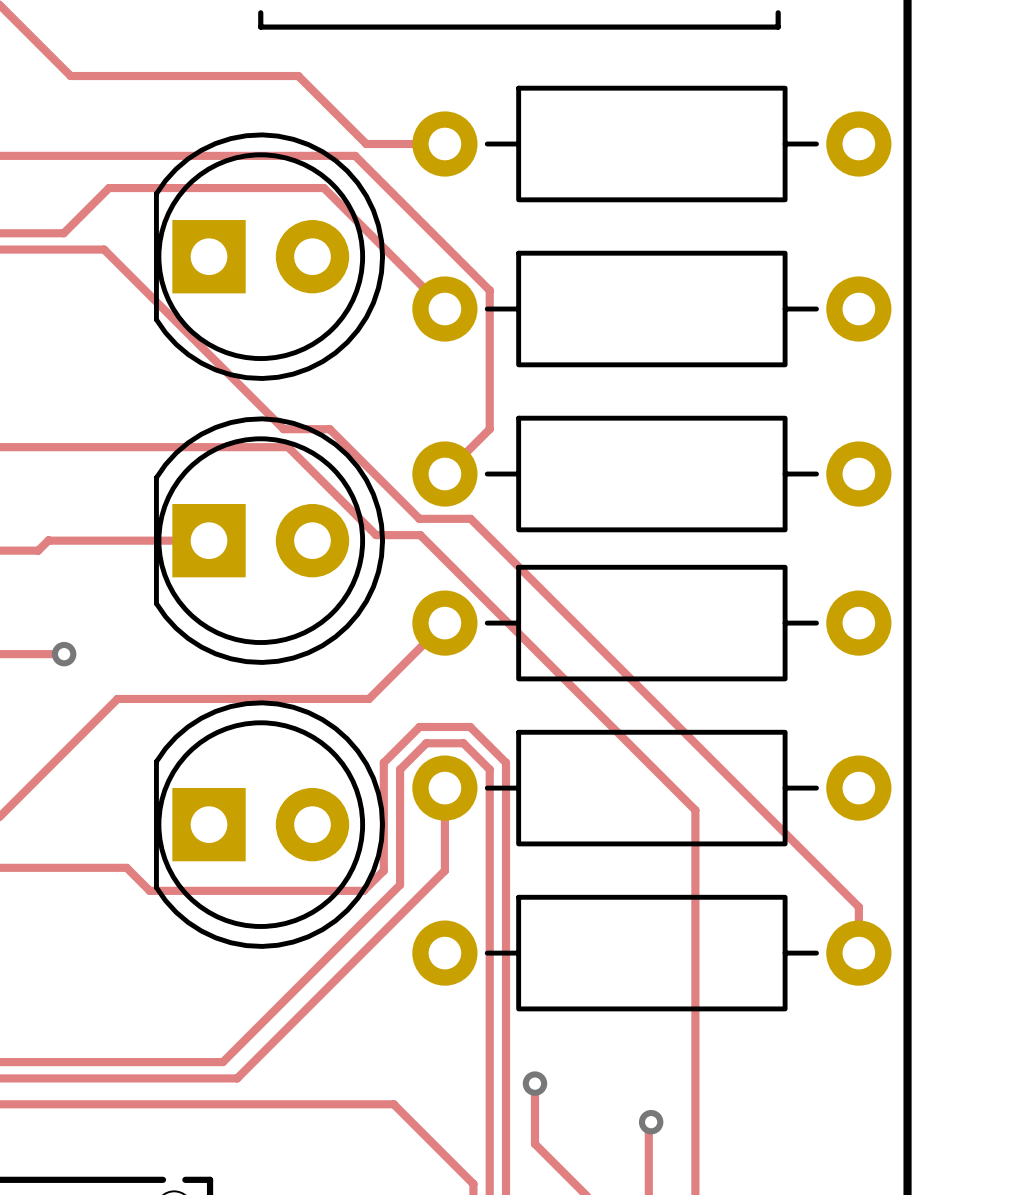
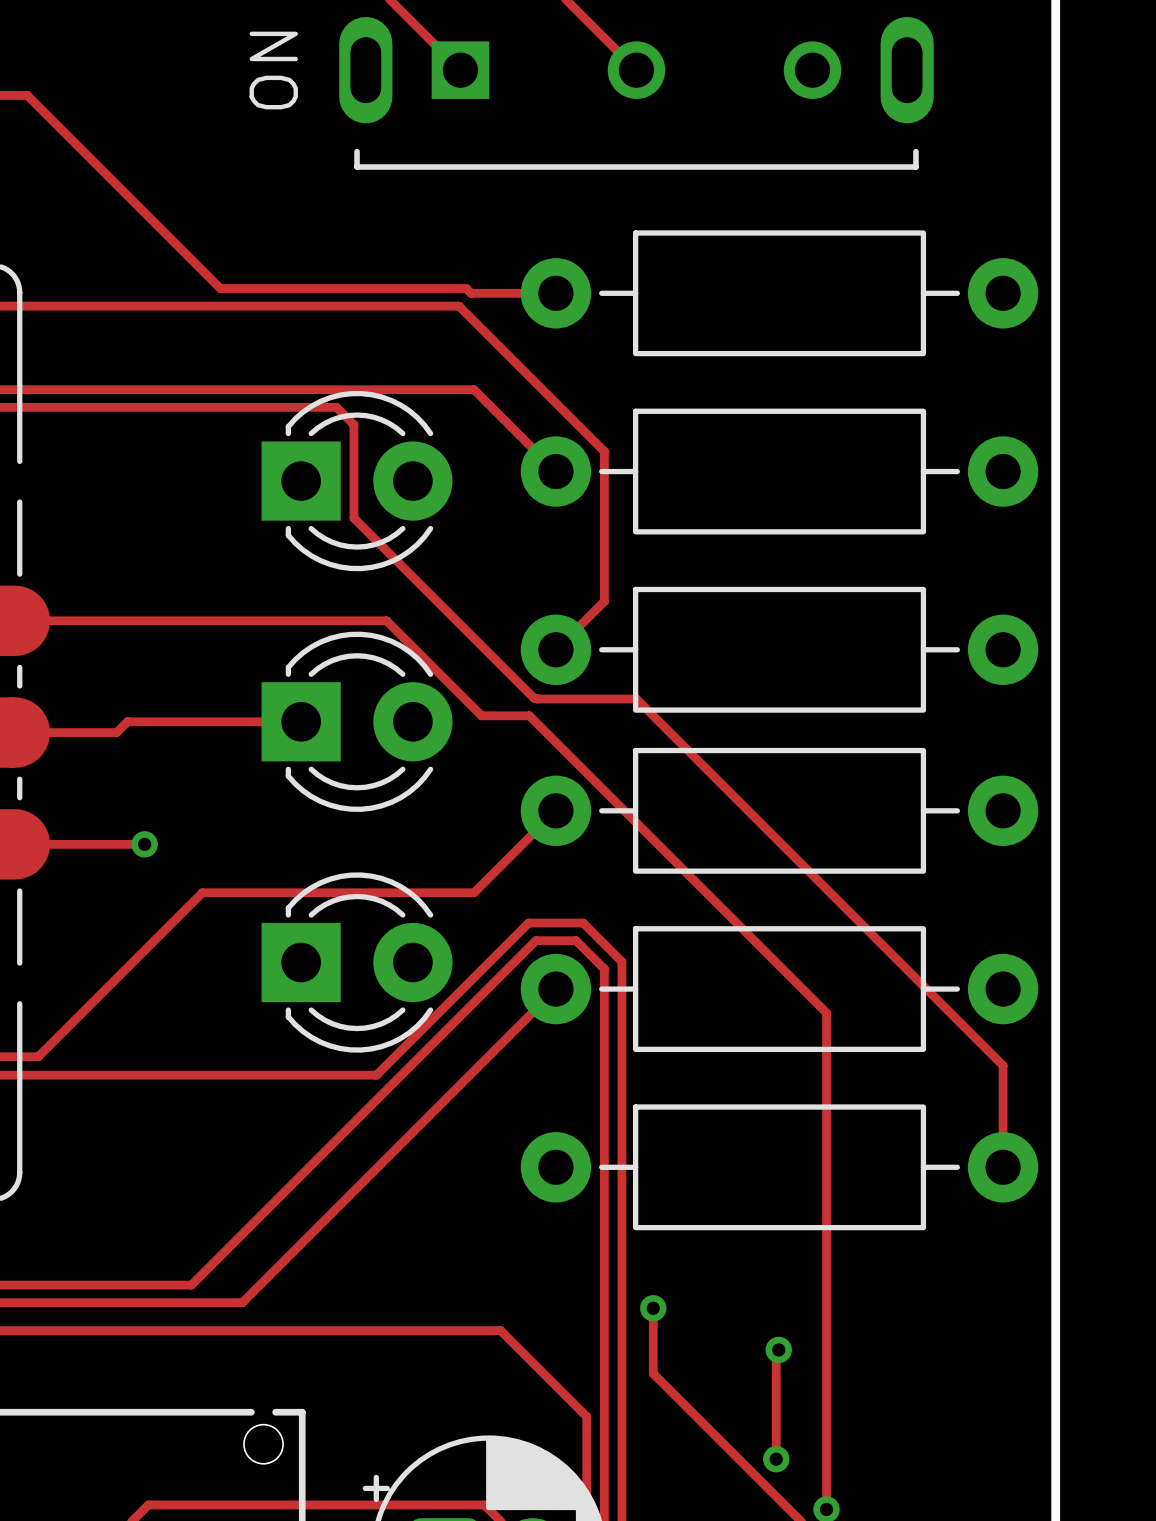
track: (70, 76) (298, 76) (361, 139) -> (151, 219) (220, 288) (466, 288)
track: (63, 233) (108, 188) (323, 188) (369, 233) -> (144, 389) (474, 389)
track: (104, 249) (283, 429) (329, 429) (419, 518) (424, 518) -> (187, 407) (336, 407) (353, 424) (353, 518) (533, 698)
part: (269, 256) -> none
part: none -> (357, 481)
part footprint: [154, 416, 386, 665] -> [261, 631, 453, 812]
track: (427, 518) (470, 518) (858, 907) -> (536, 698) (636, 699) (1003, 1065) (1003, 1117)
track: (383, 762) (383, 870) (363, 890) (149, 890) (126, 867) -> (489, 961) (376, 1075) (212, 1075)
part: none -> (357, 962)
track: (400, 769) (400, 884) (222, 1062) (107, 1062) -> (507, 969) (191, 1285)
track: (444, 788) (444, 870) (237, 1078) (154, 1078) -> (555, 989) (242, 1302)
part: (269, 824) -> none

